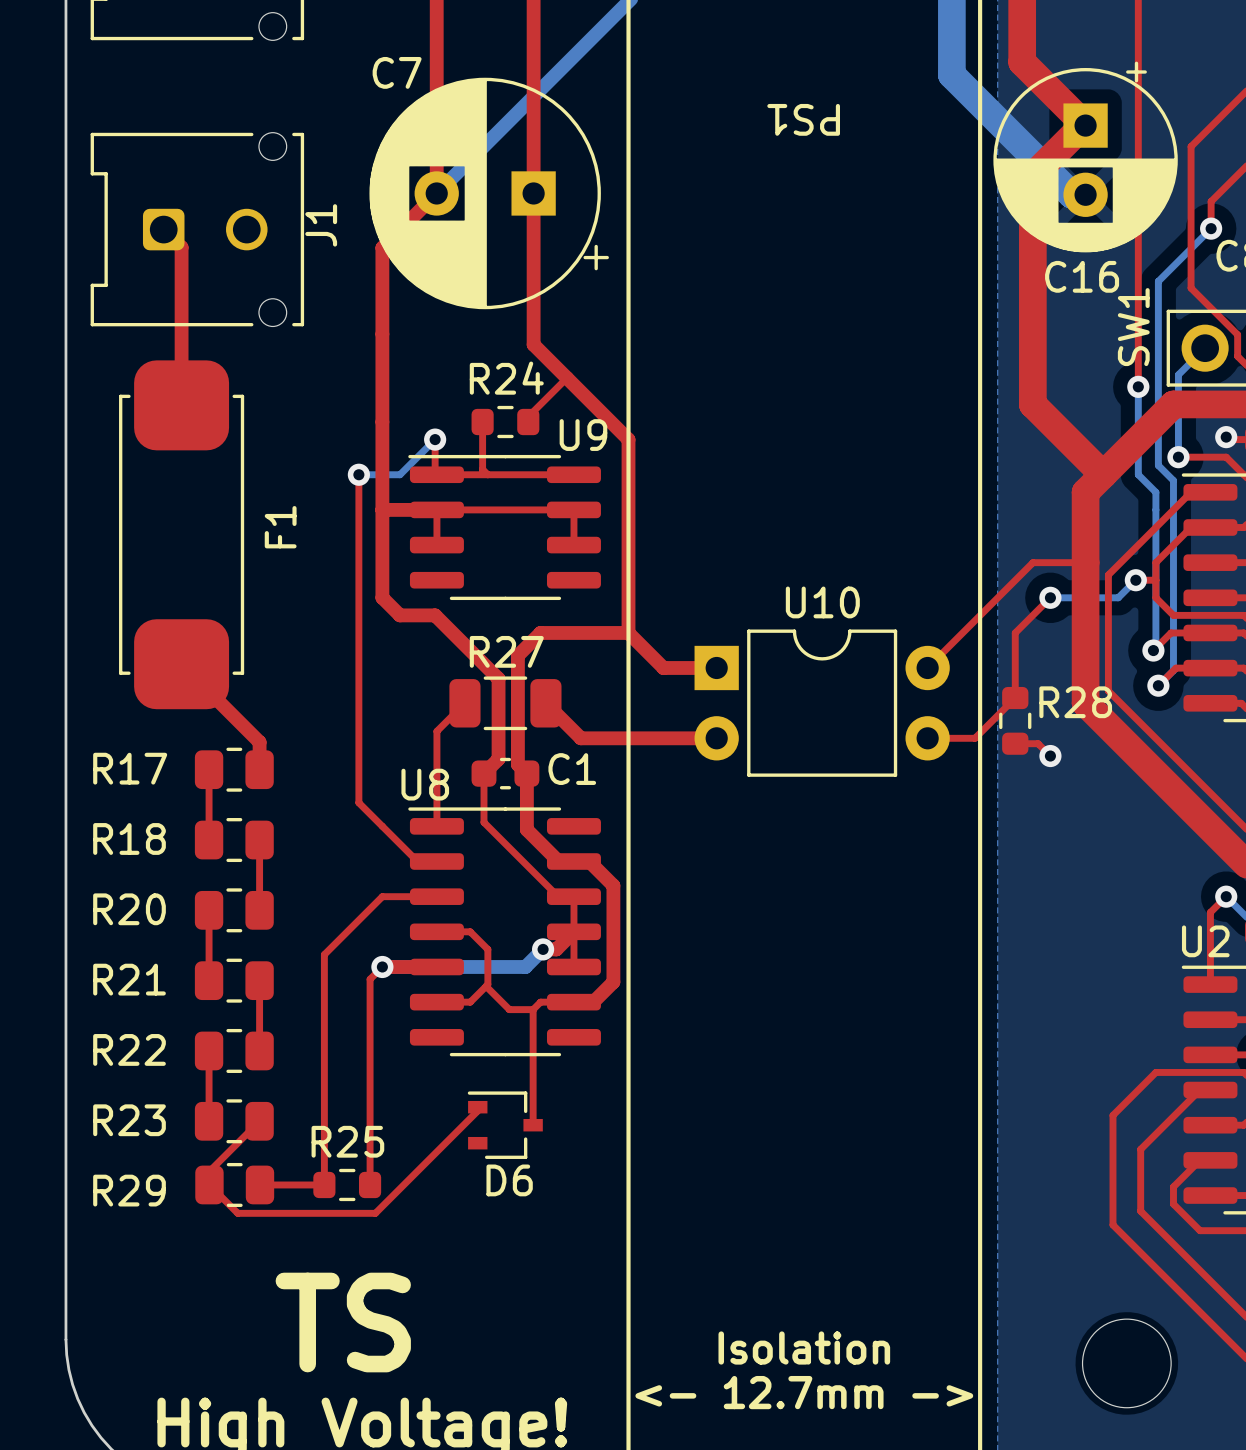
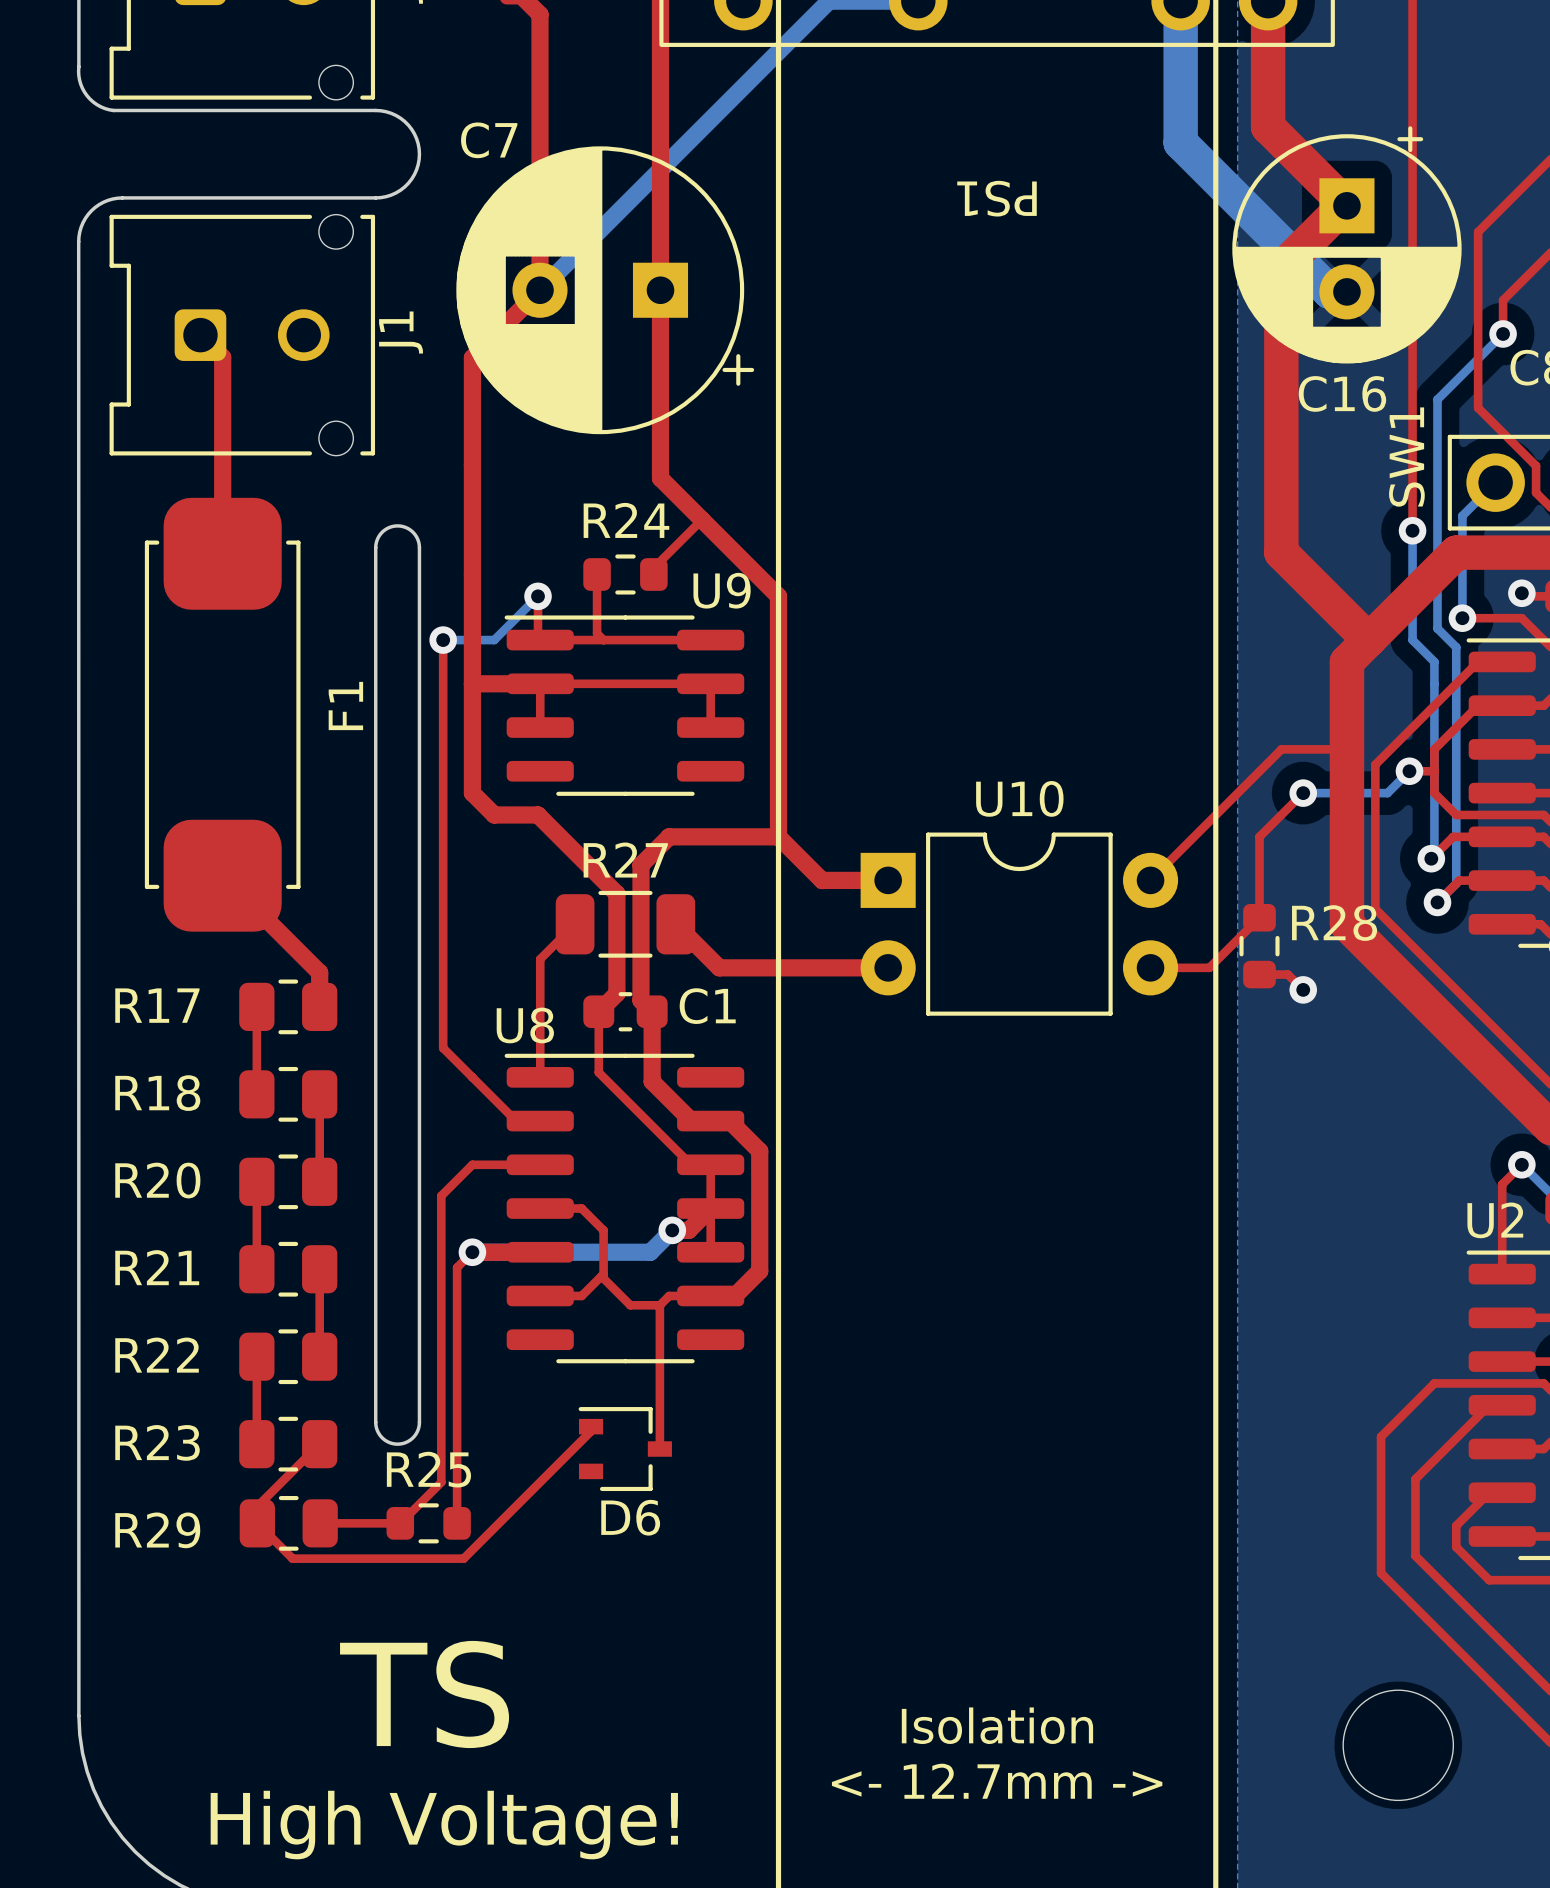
board edge: (65, 13) (65, 1339) -> (78, 66) (79, 79) (84, 92) (93, 102) (109, 109) (380, 110) (396, 115) (408, 125) (416, 138) (419, 154) (416, 169) (411, 179) (400, 190) (386, 196) (117, 198) (103, 202) (91, 210) (83, 222) (79, 231) (78, 1715)
board edge: none -> (375, 547) (375, 1422) (381, 1436) (389, 1442) (397, 1444) (405, 1442) (413, 1436) (419, 1422) (419, 547) (413, 533) (405, 527) (397, 525) (389, 527) (381, 533) (375, 547)
top track: (357, 921) (324, 954) (324, 1184) -> (441, 1195) (441, 1482) (400, 1523)

